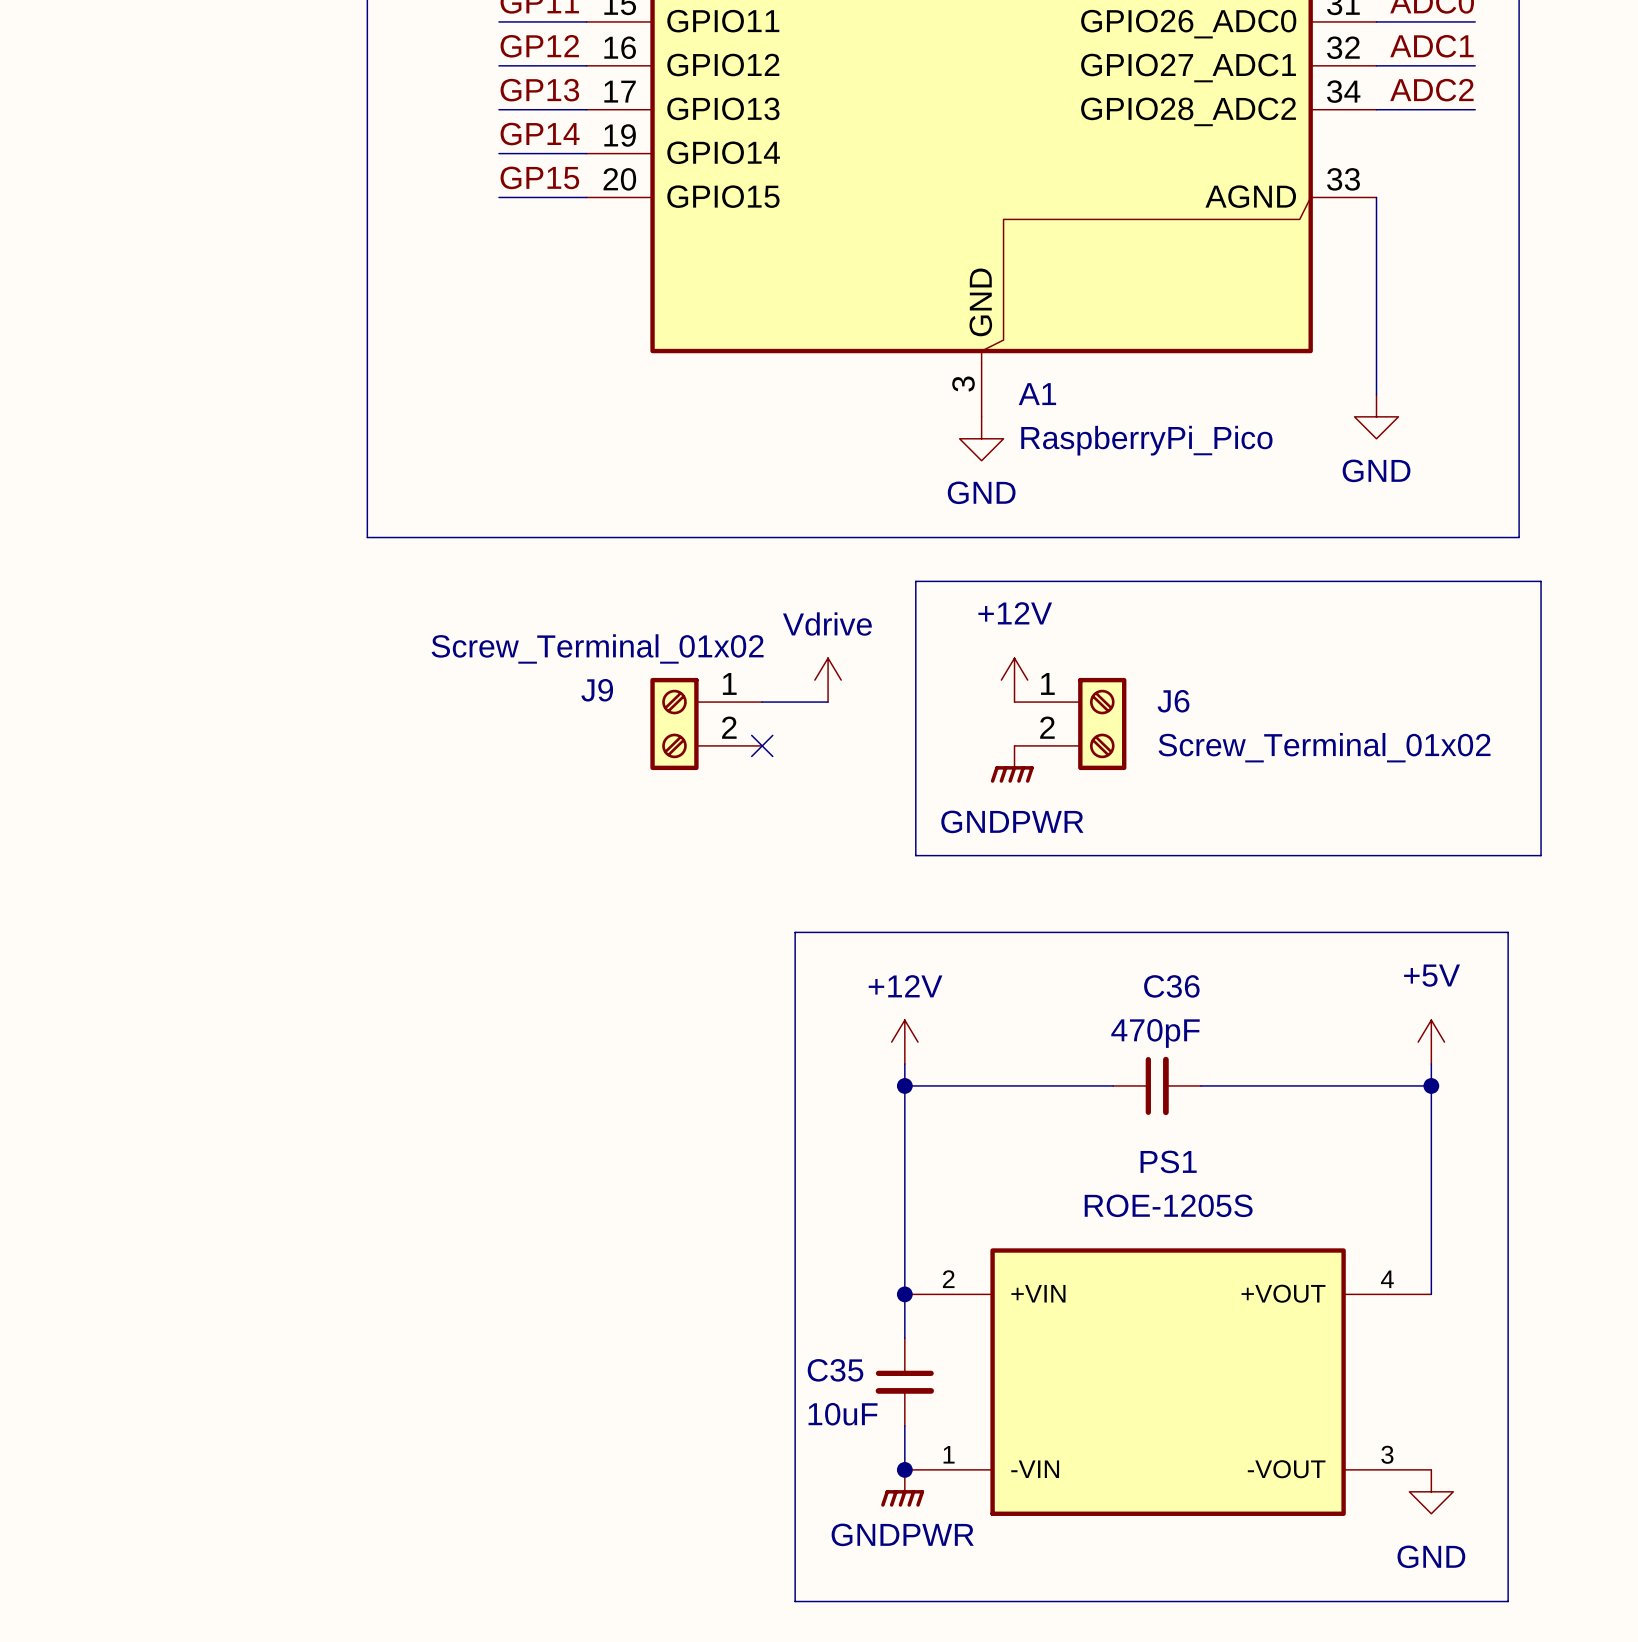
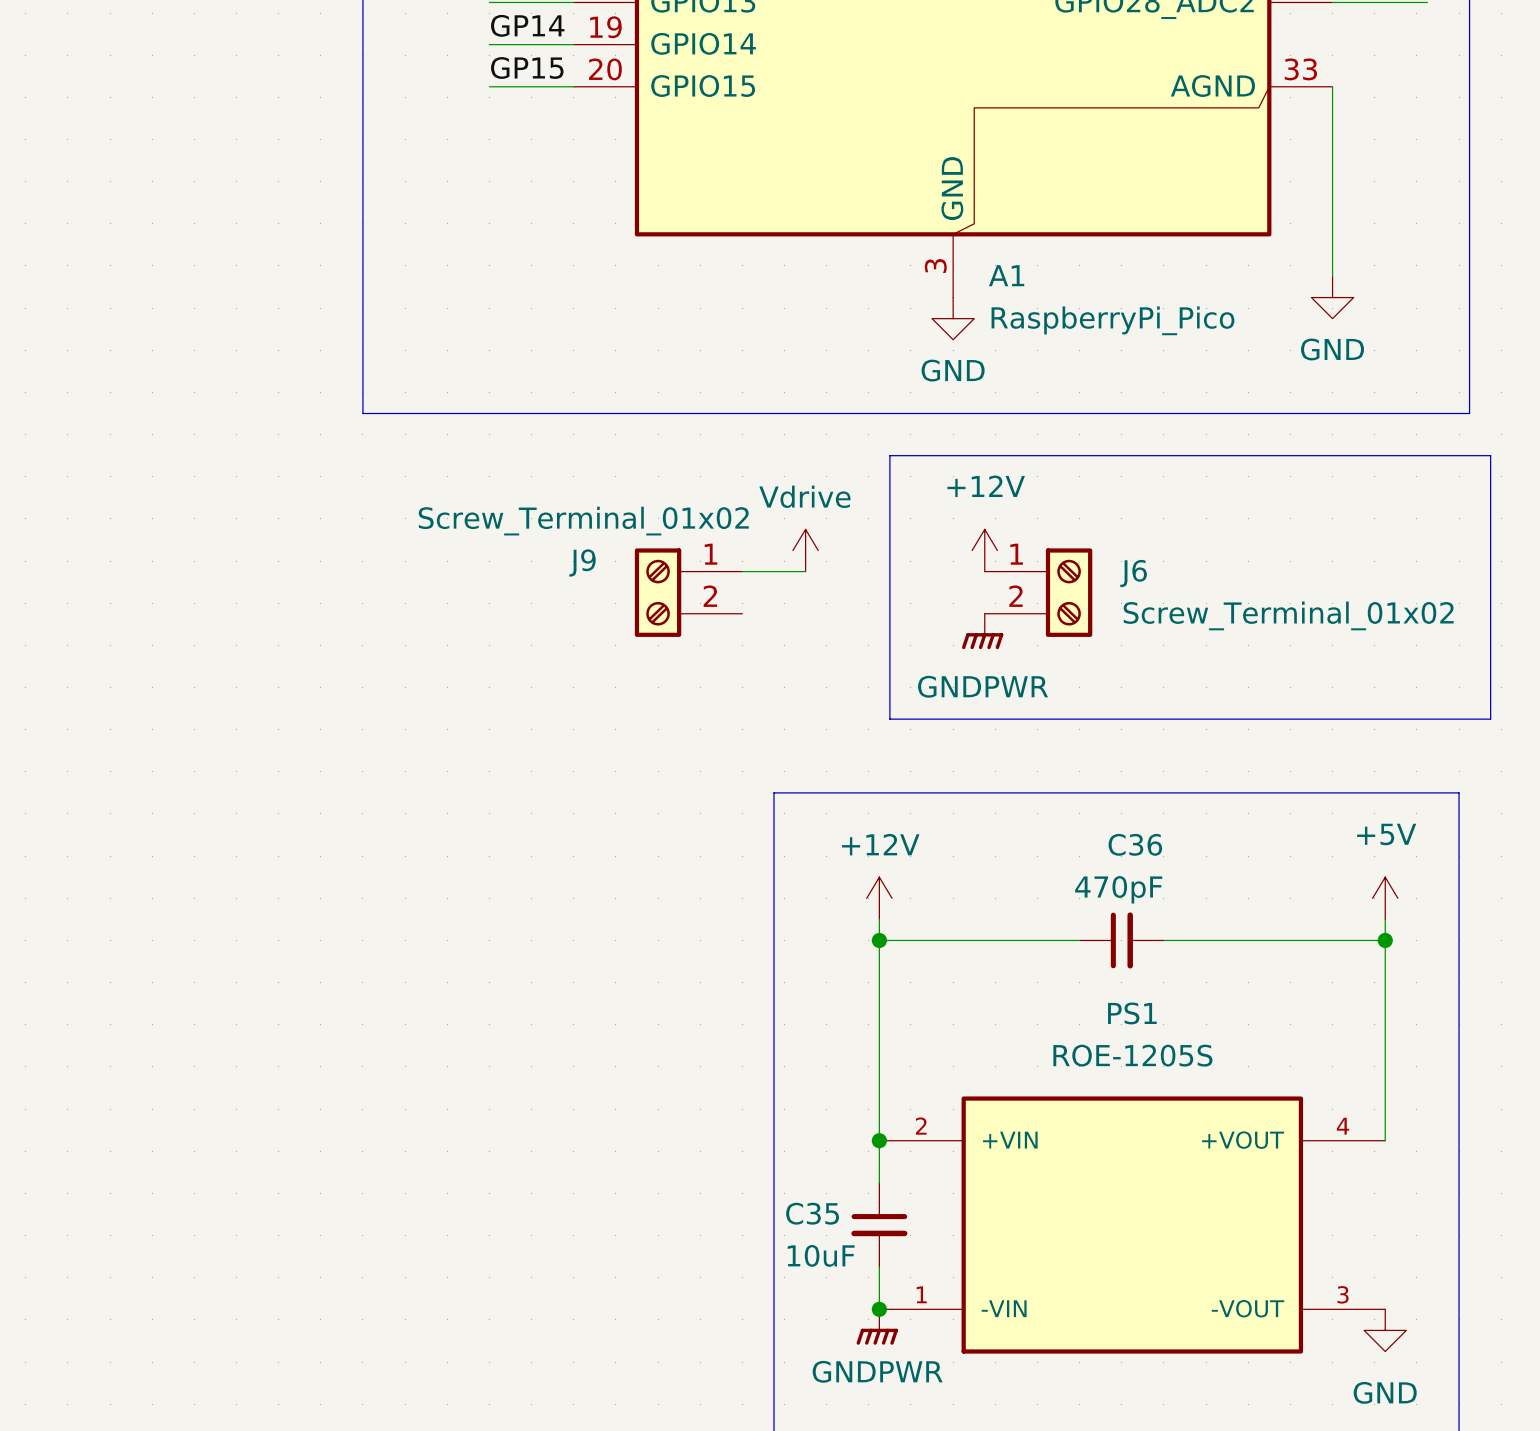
no-connect mark: (762, 745) -> none

